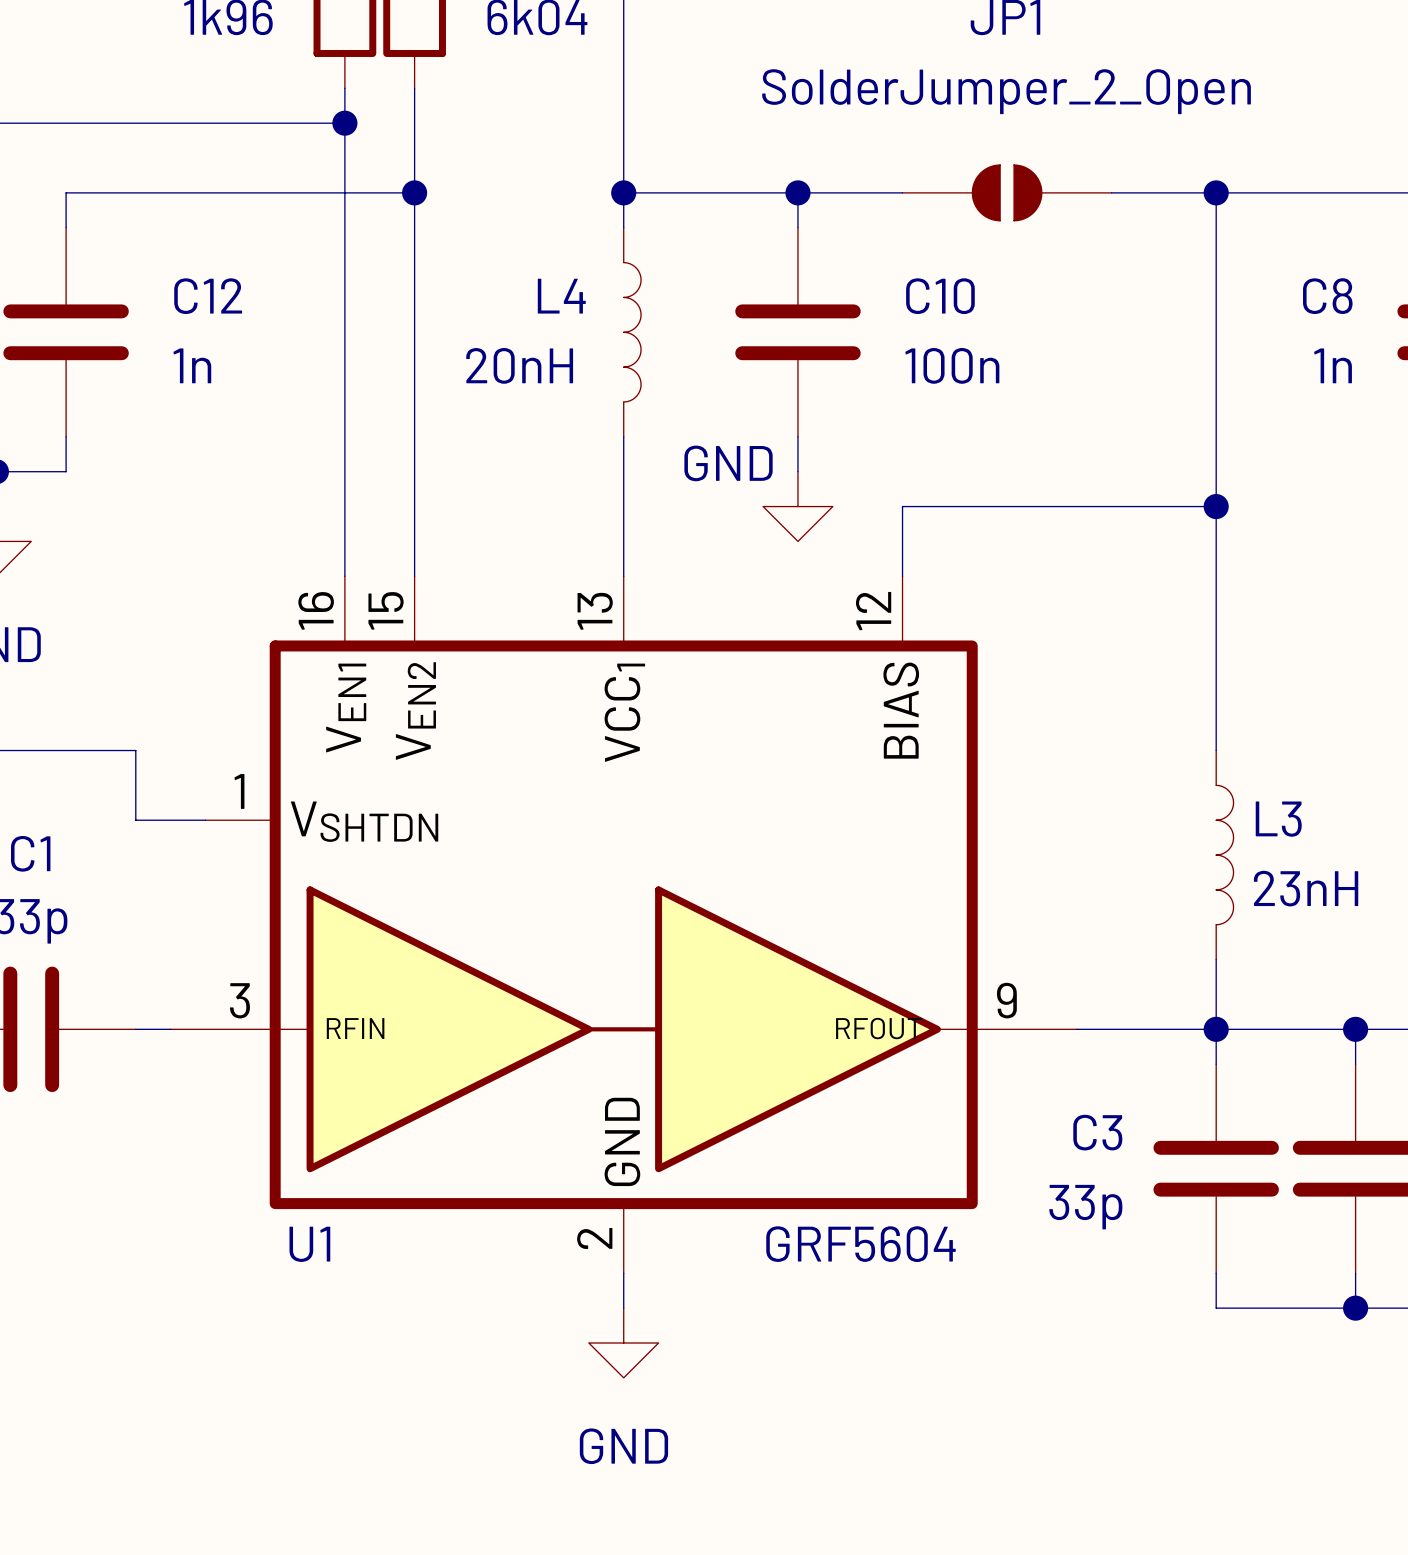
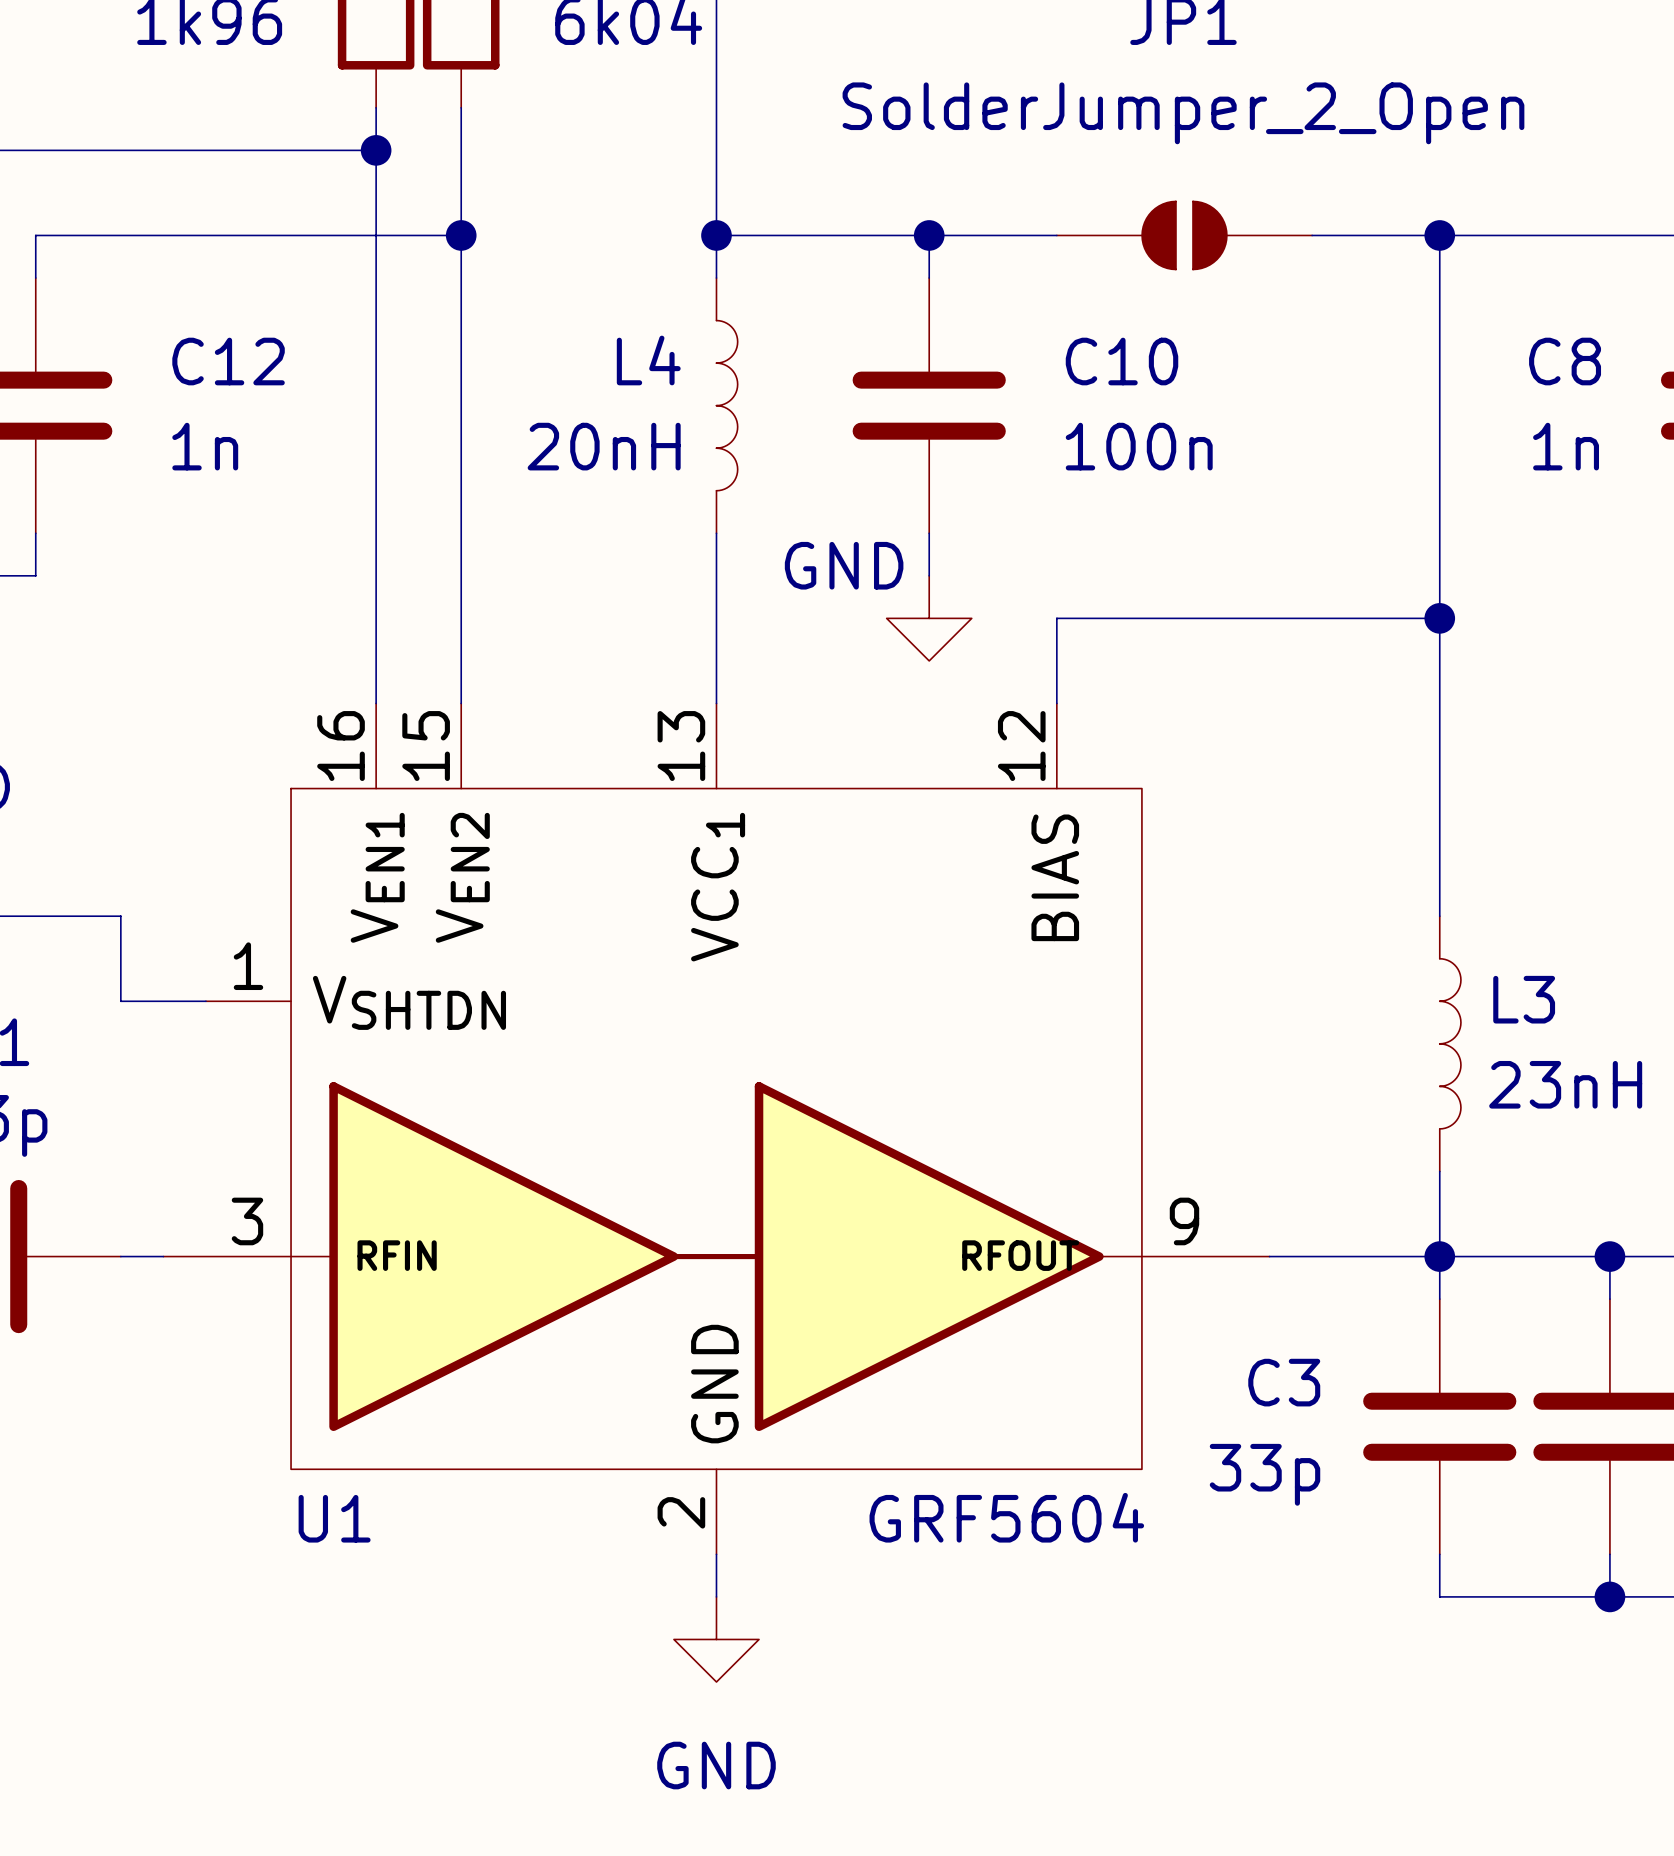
U1 symbol: [170, 576, 1077, 1274] -> [163, 703, 1270, 1555]

